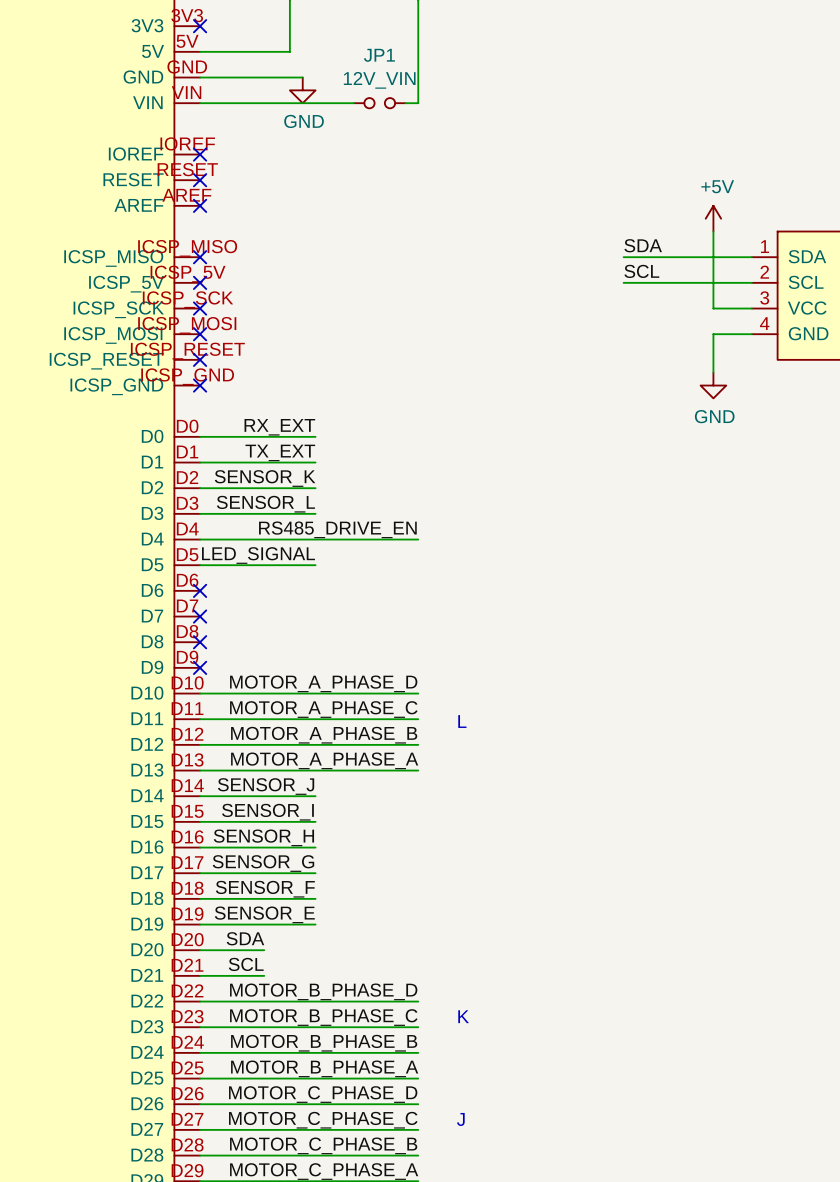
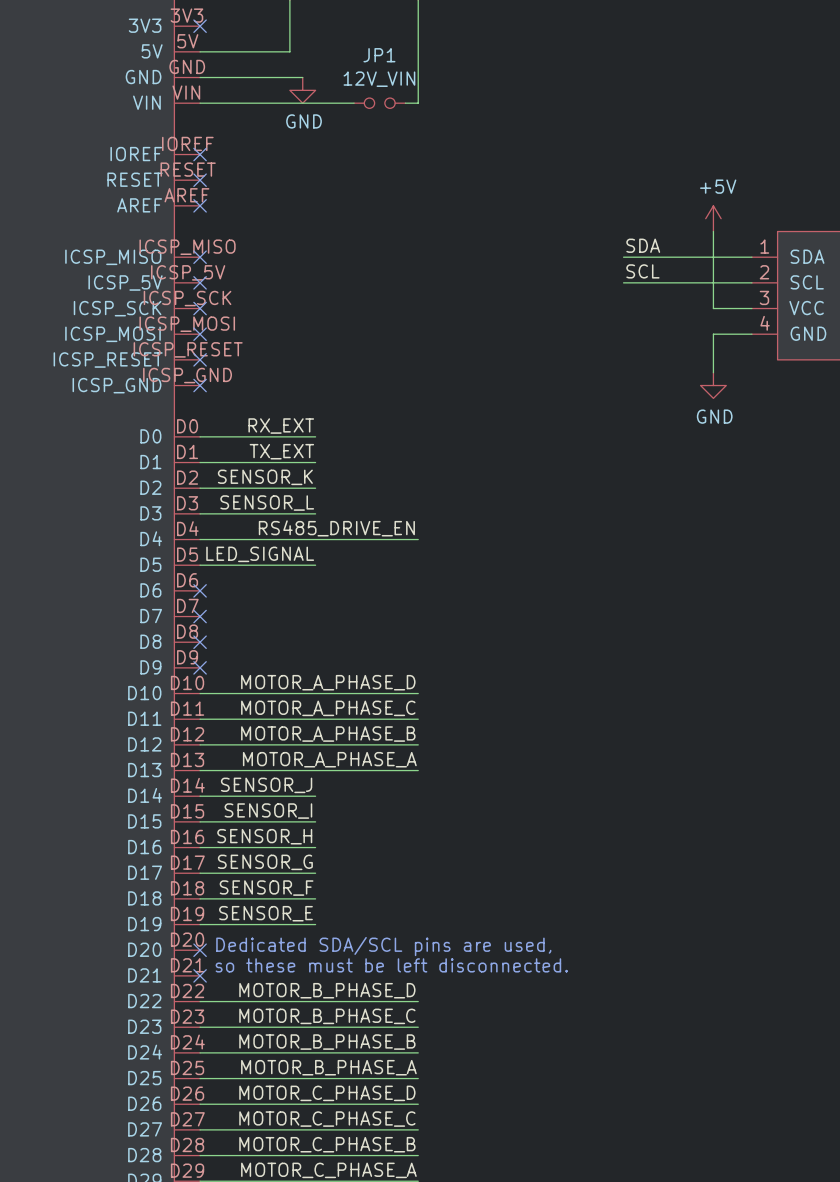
text: L (462, 721) -> none
label: SDA (245, 938) -> none
text: none -> Dedicated SDA/SCL pins are used, (383, 946)
wire: (200, 950) (264, 950) -> none
no-connect mark: none -> (200, 950)
label: SCL (246, 964) -> none
text: none -> so these must be left disconnected. (391, 965)
wire: (200, 975) (264, 975) -> none
no-connect mark: none -> (200, 975)
text: K (463, 1016) -> none
text: J (460, 1119) -> none

